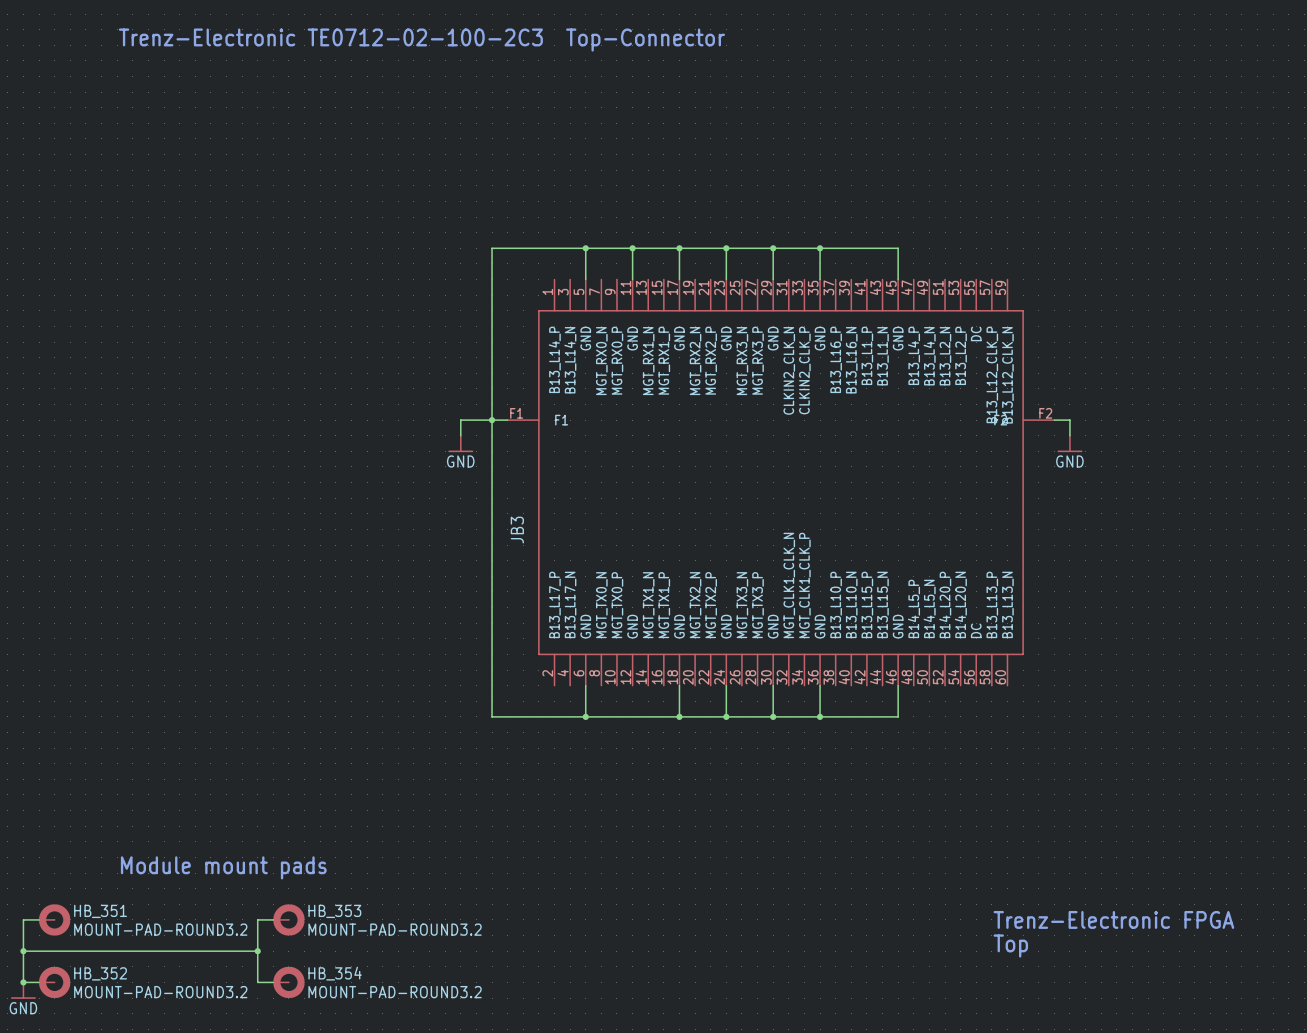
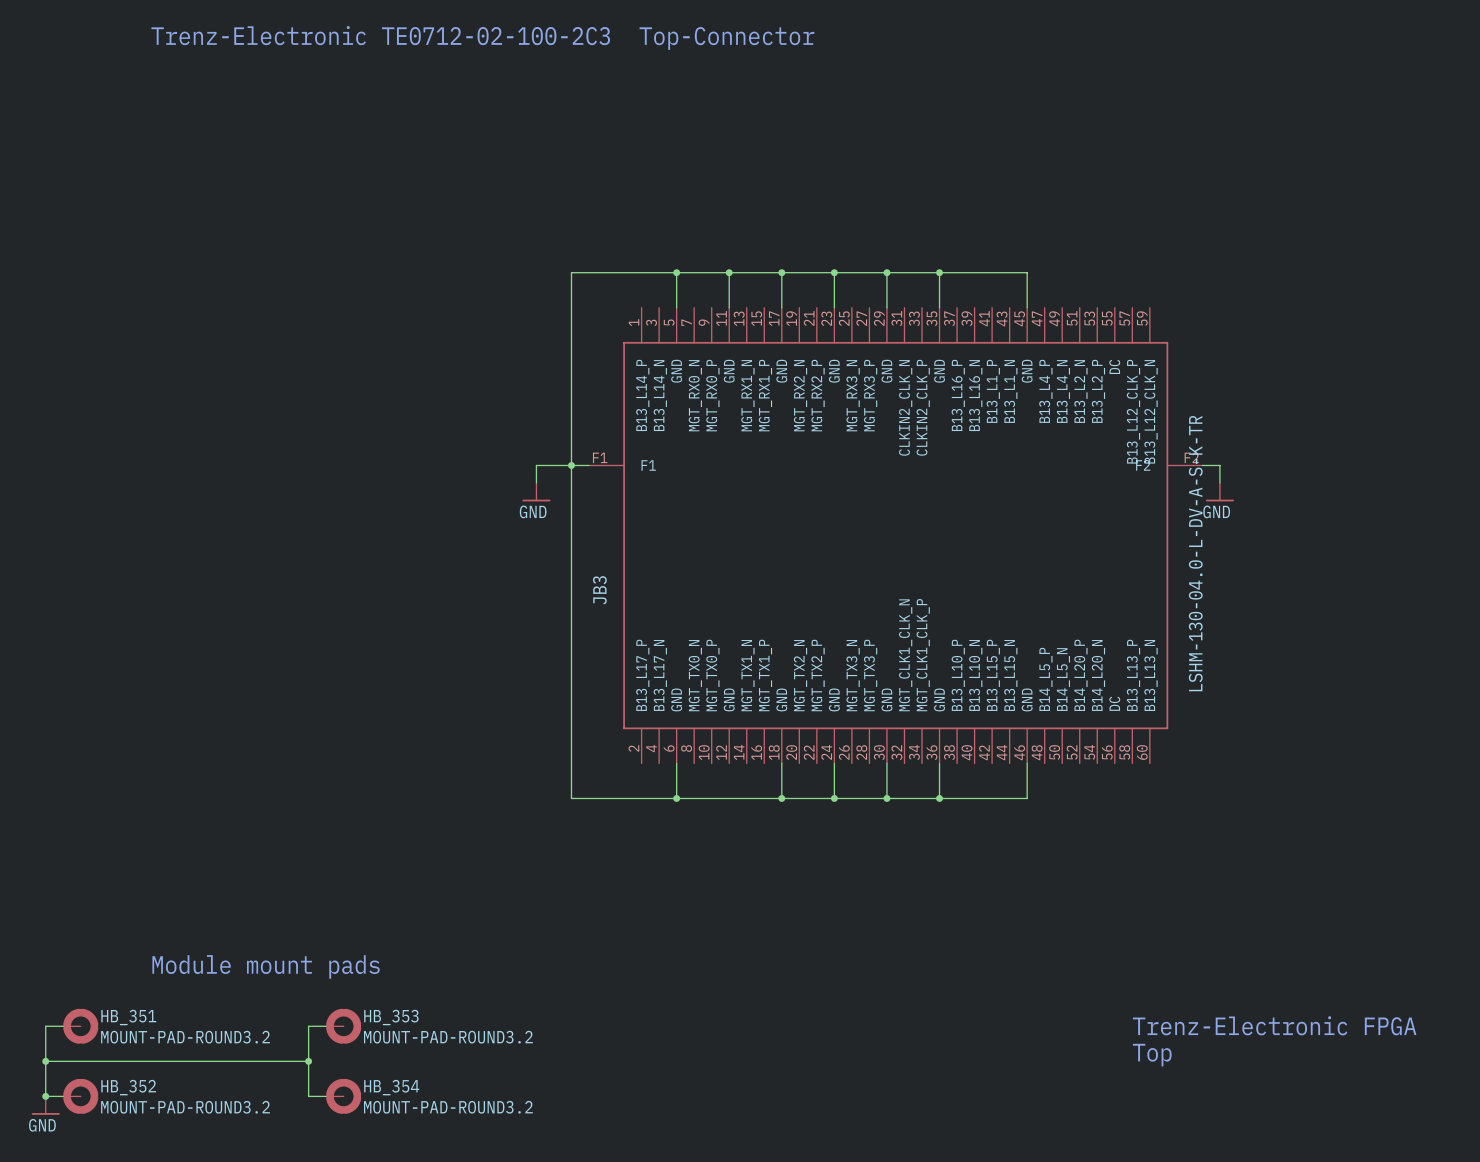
JB3 value: none -> LSHM-130-04.0-L-DV-A-S-K-TR (1195, 553)

